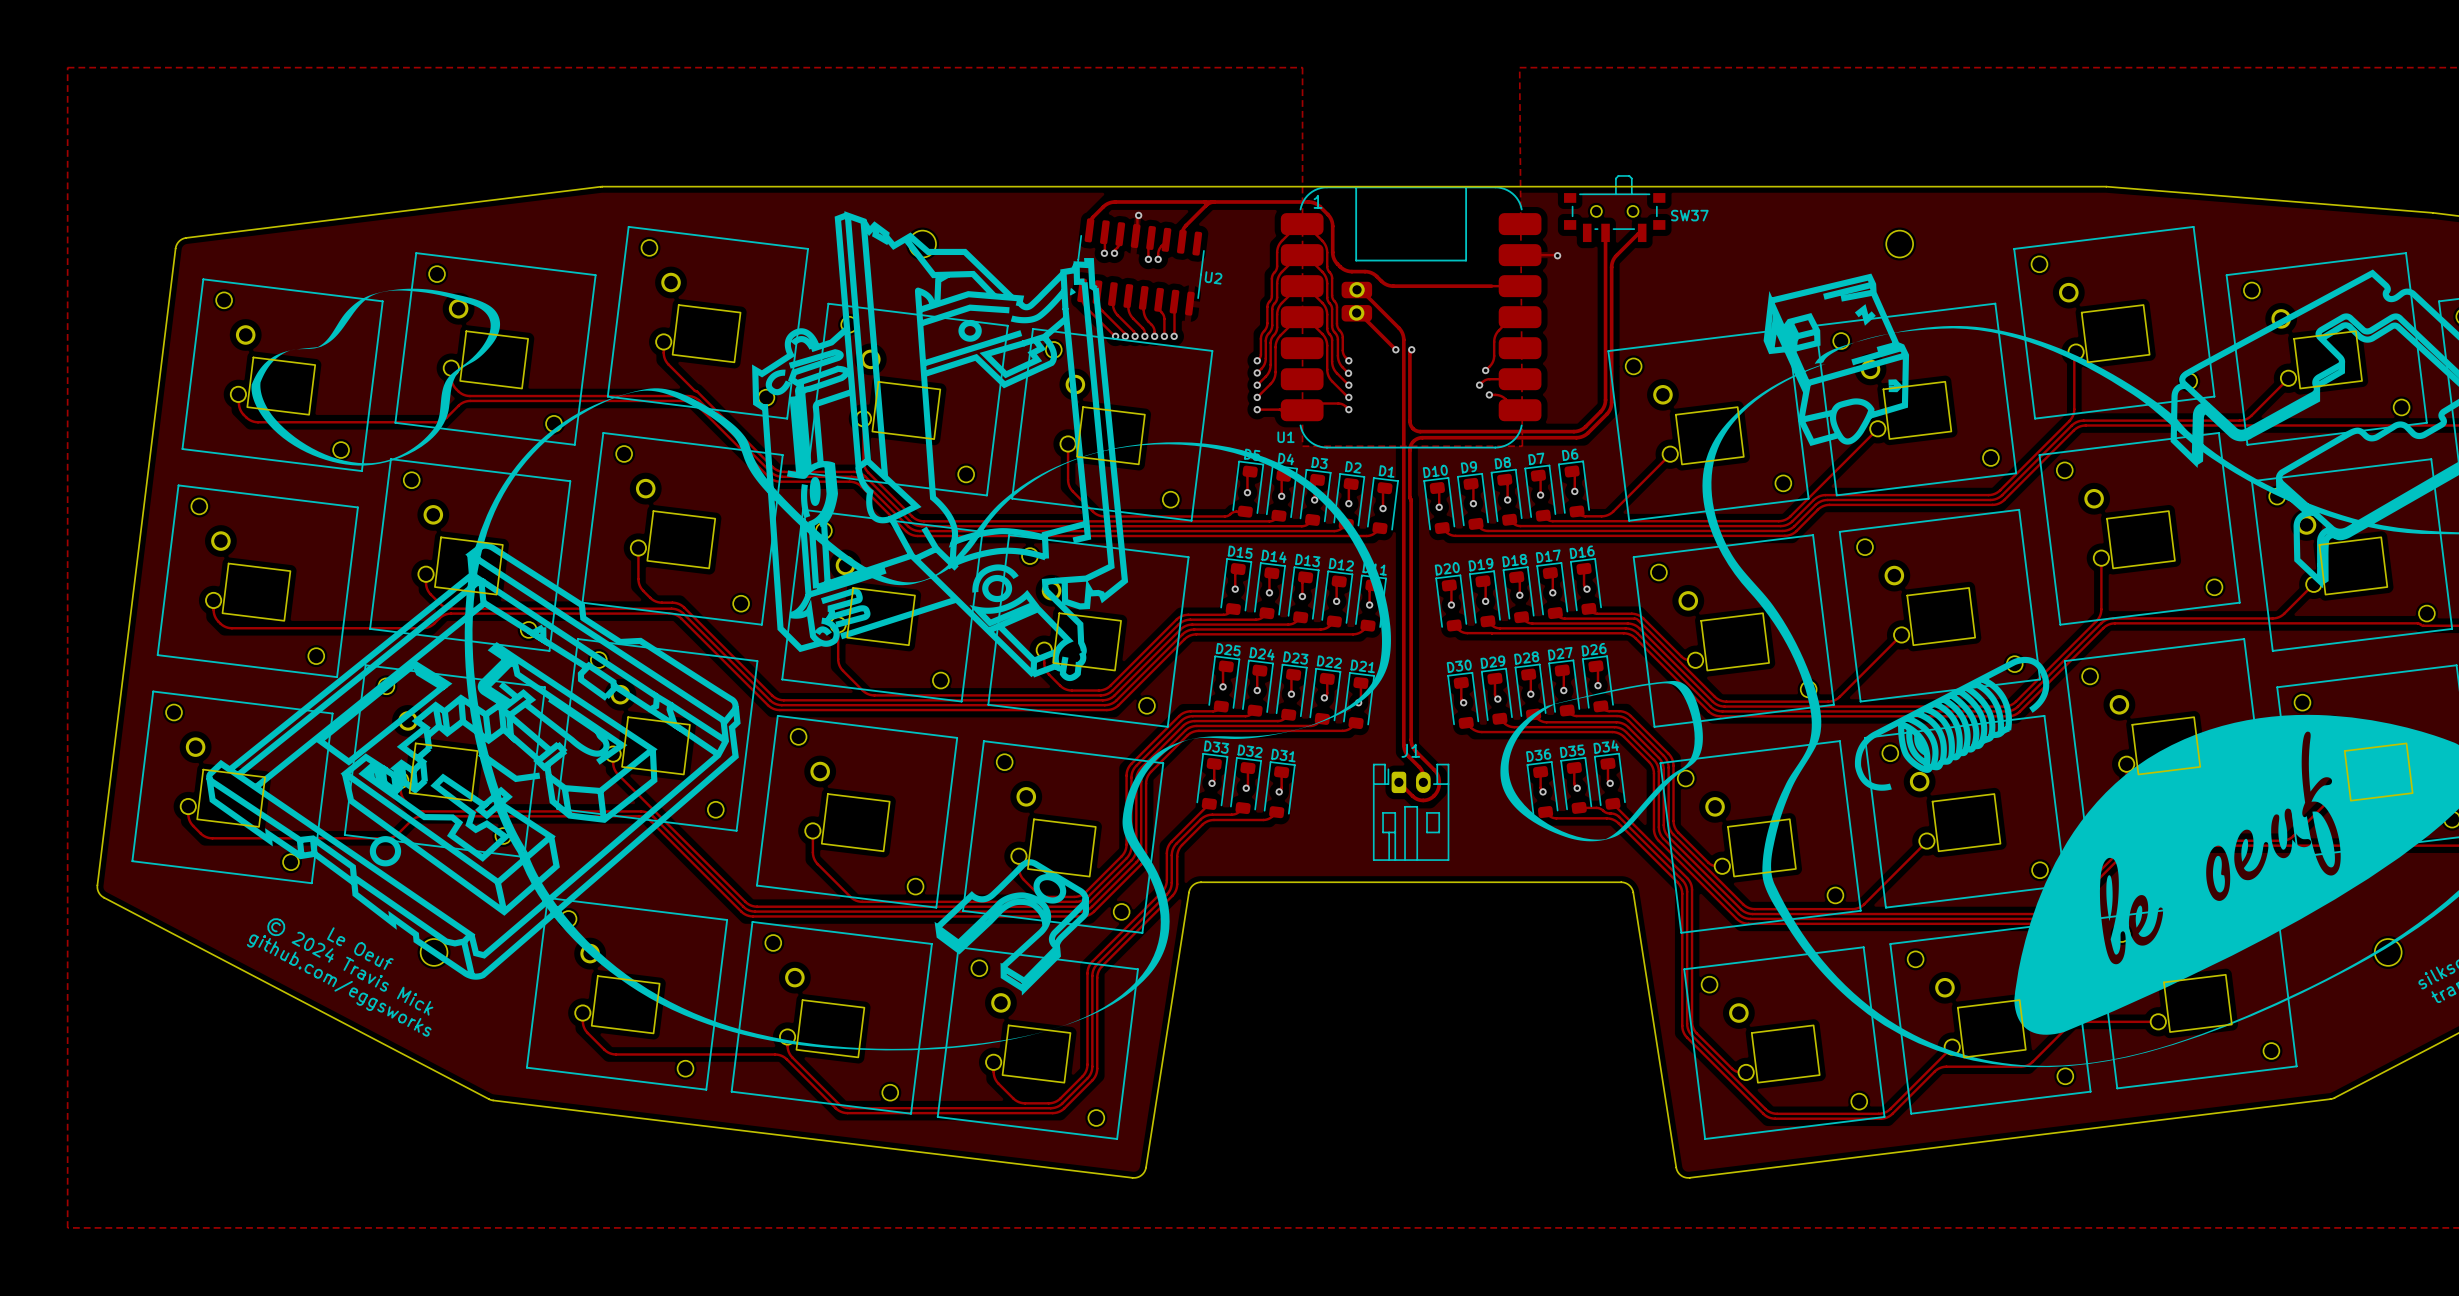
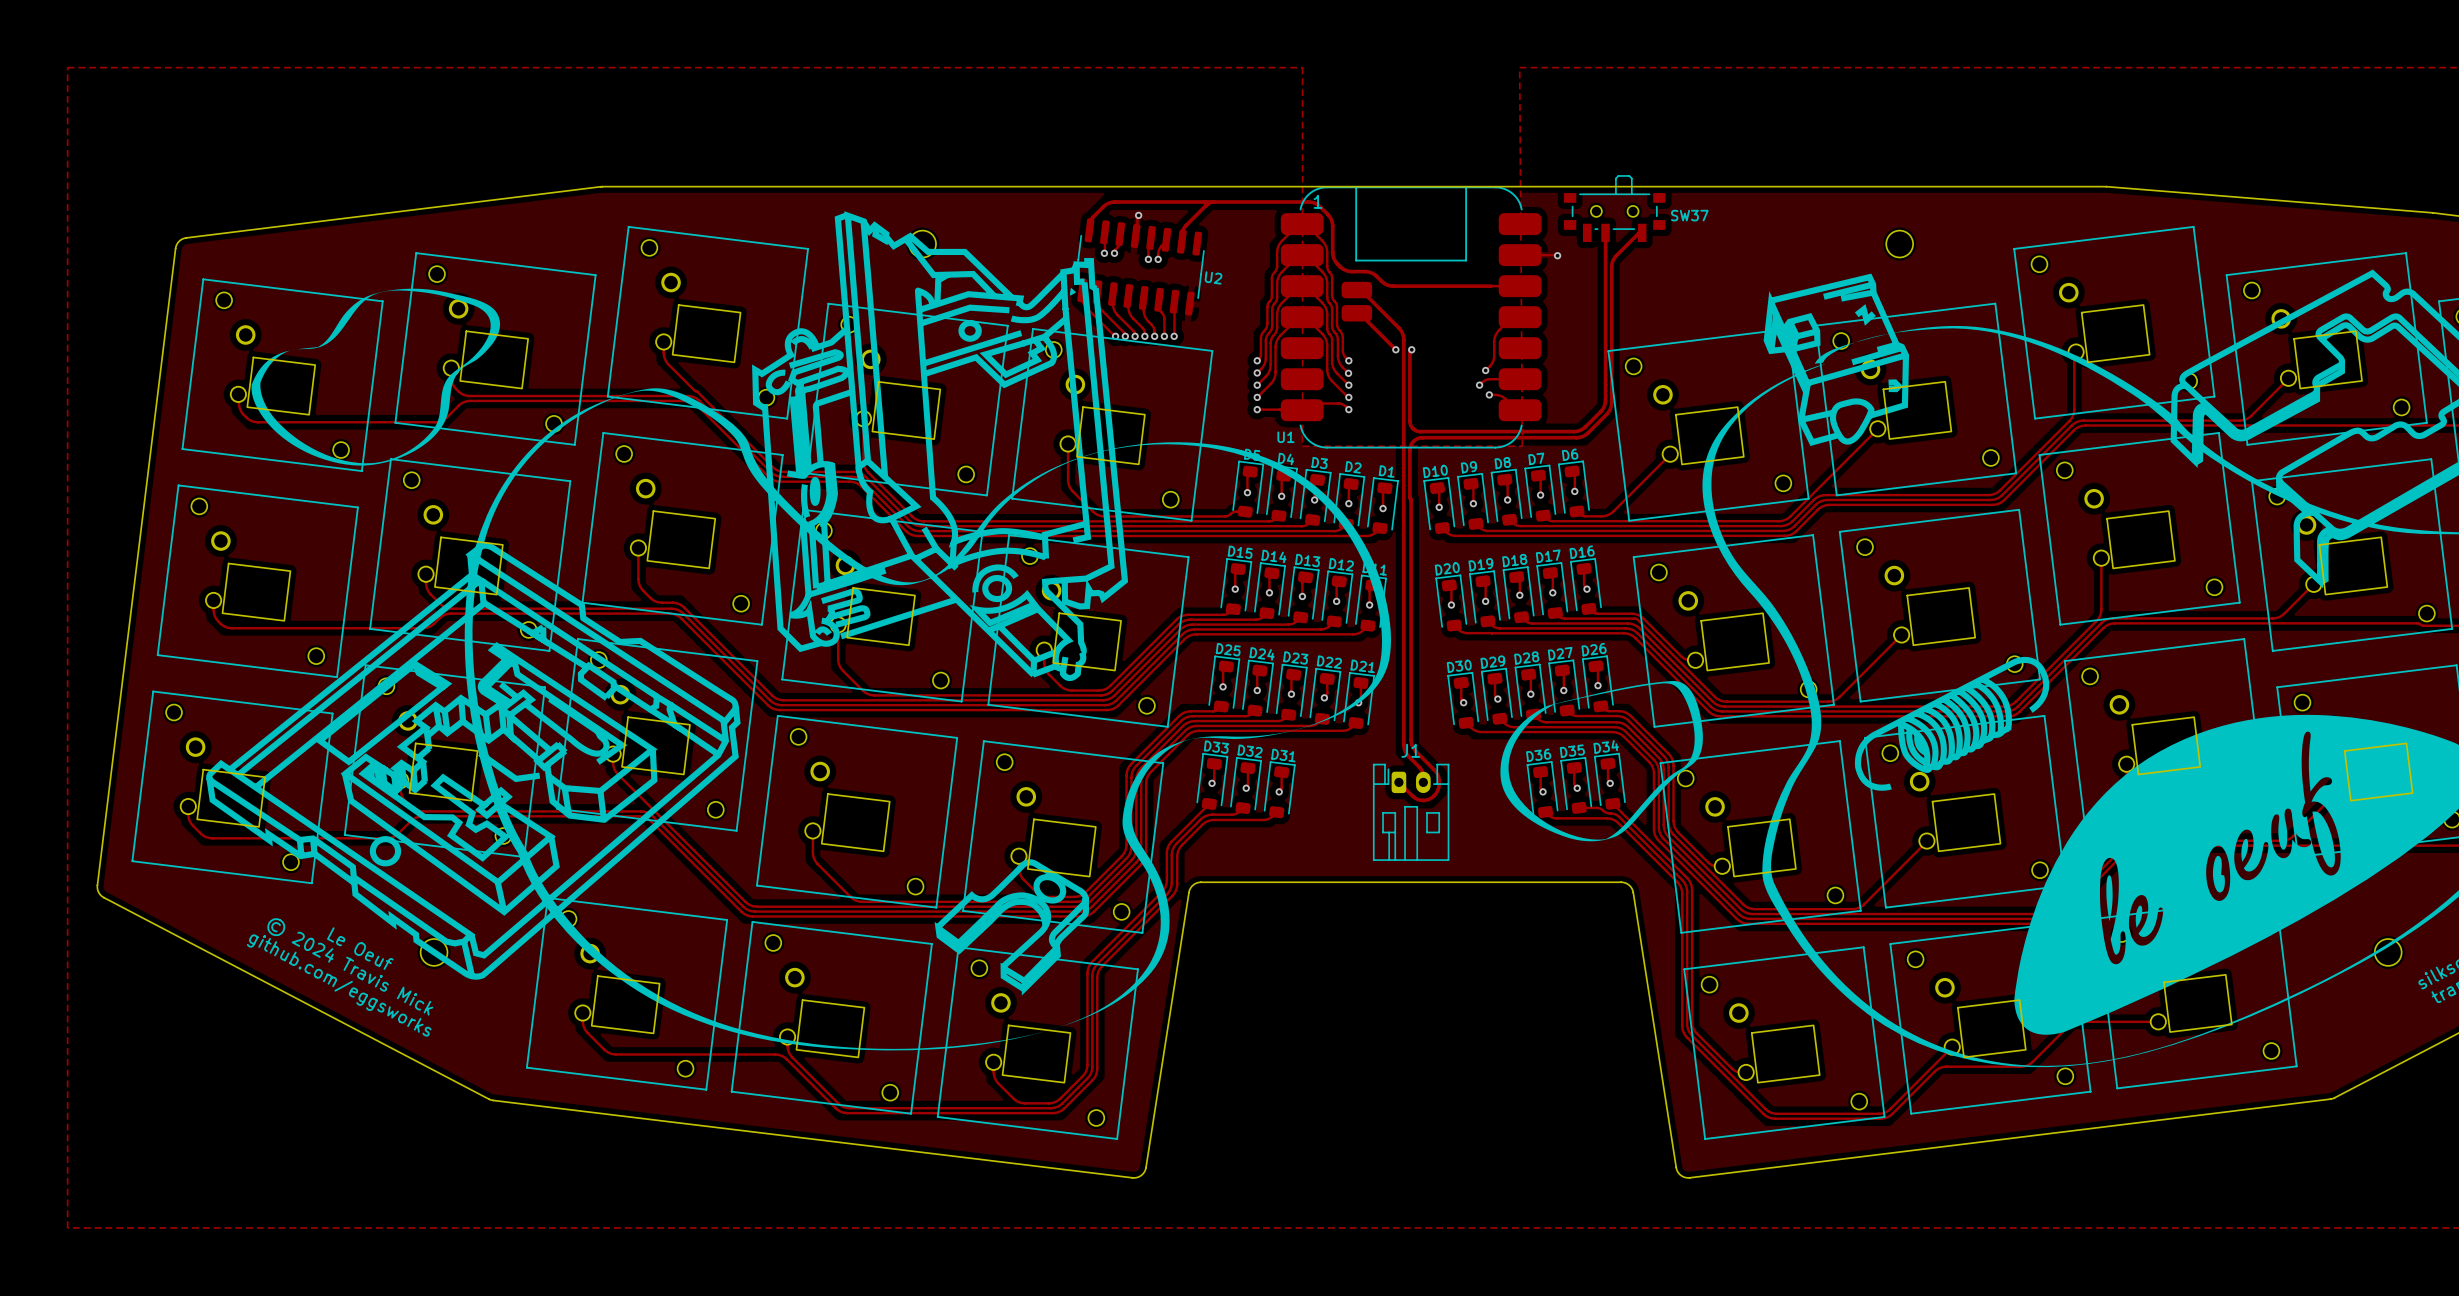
U1 footprint: [1280, 186, 1542, 449] -> [1280, 186, 1542, 449]

